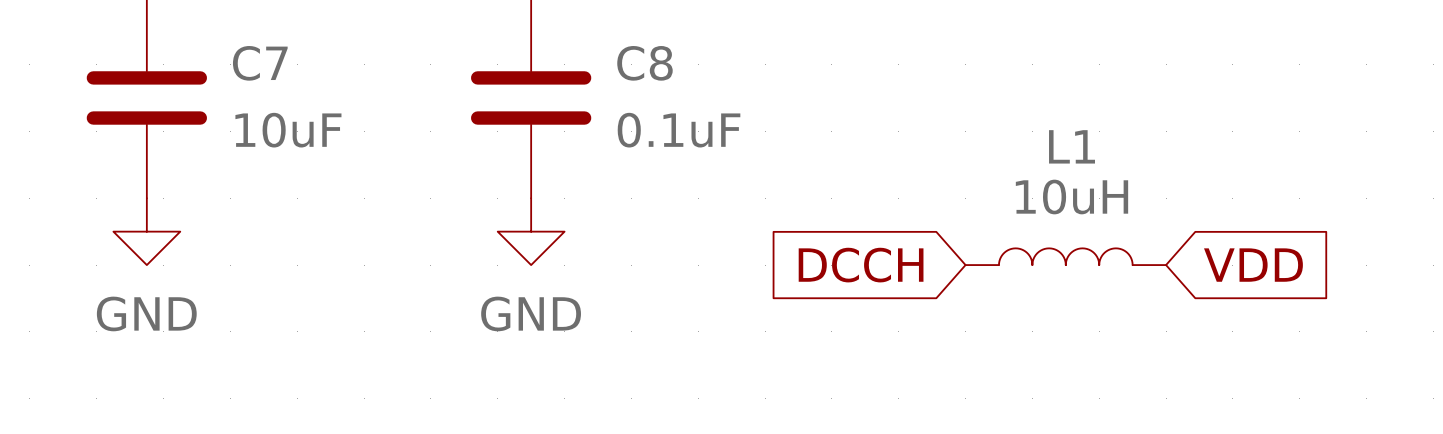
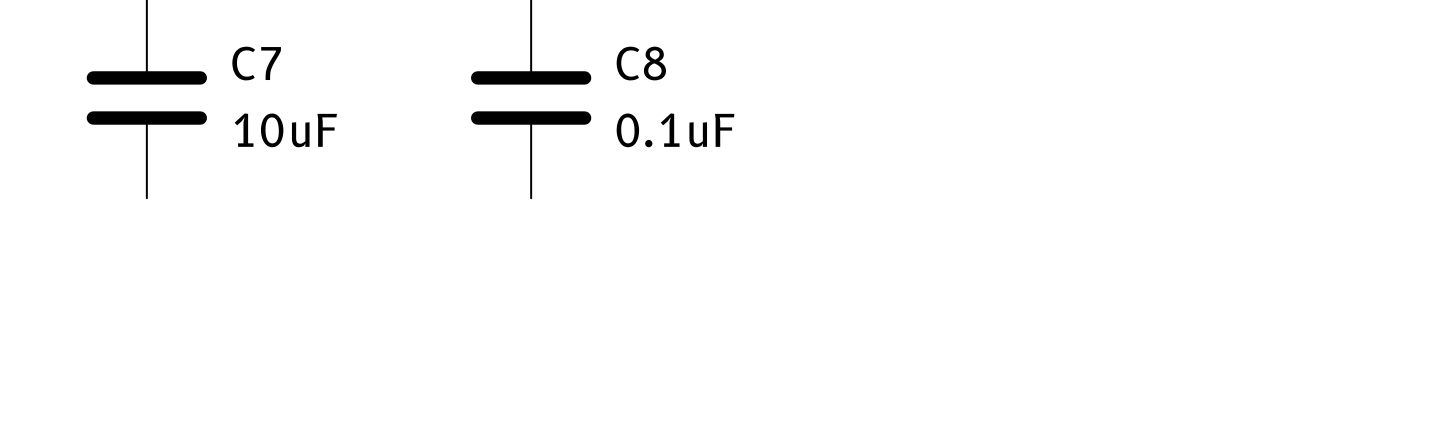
power symbol: GND (146, 231) -> none
power symbol: GND (531, 231) -> none
L1: 10uH (1065, 256) -> none
global label: DCCH (861, 265) -> none
global label: VDD (1253, 265) -> none

